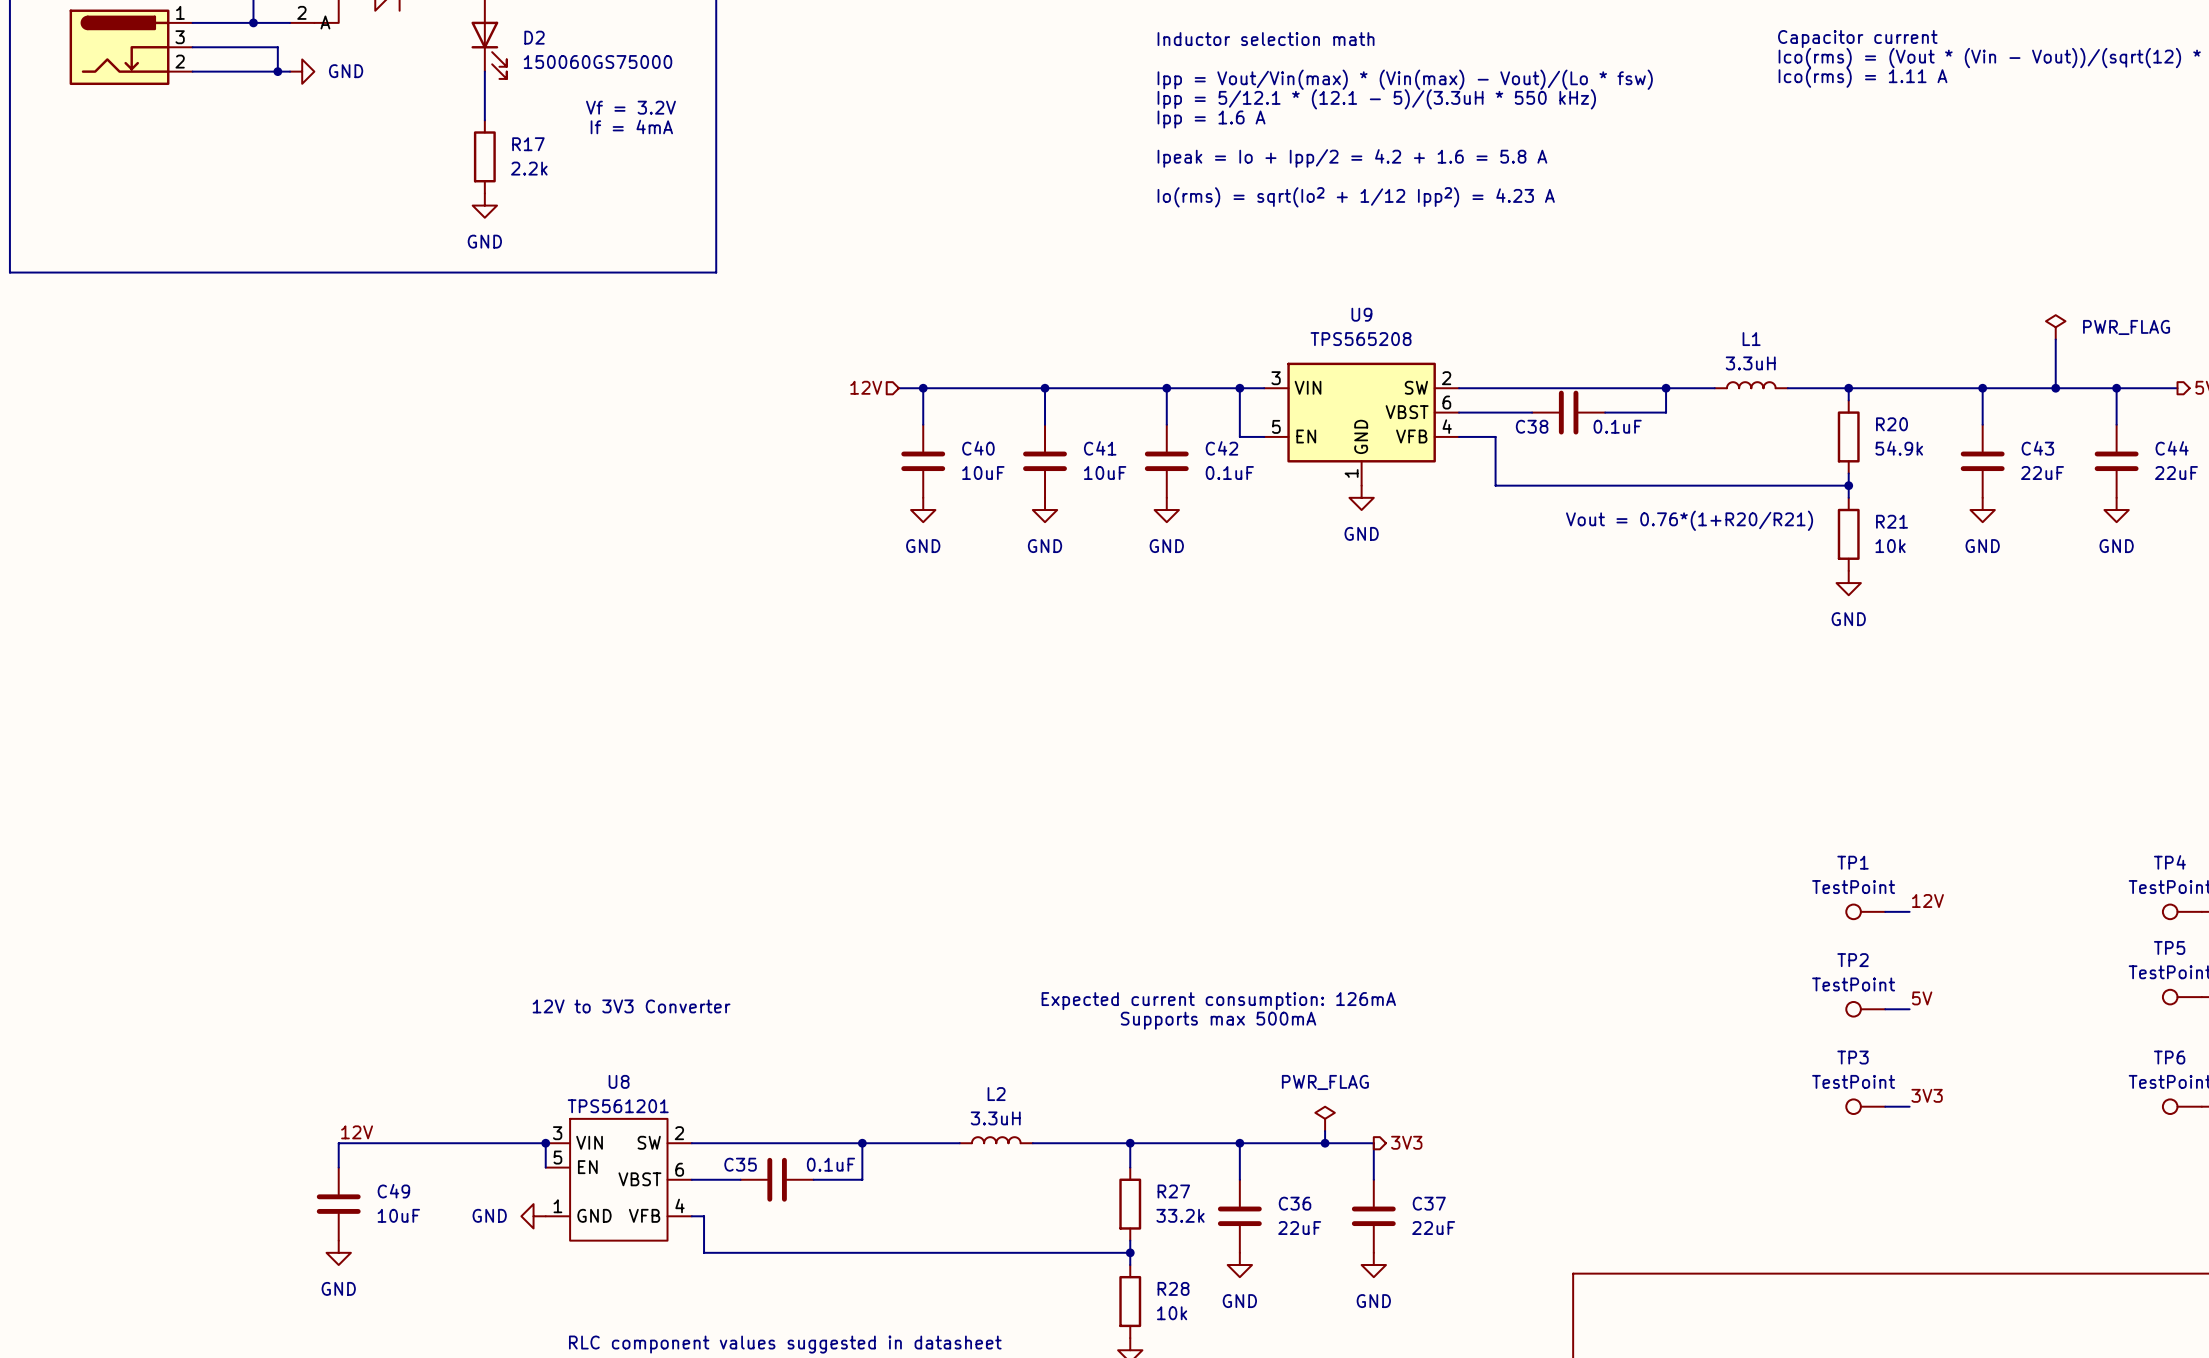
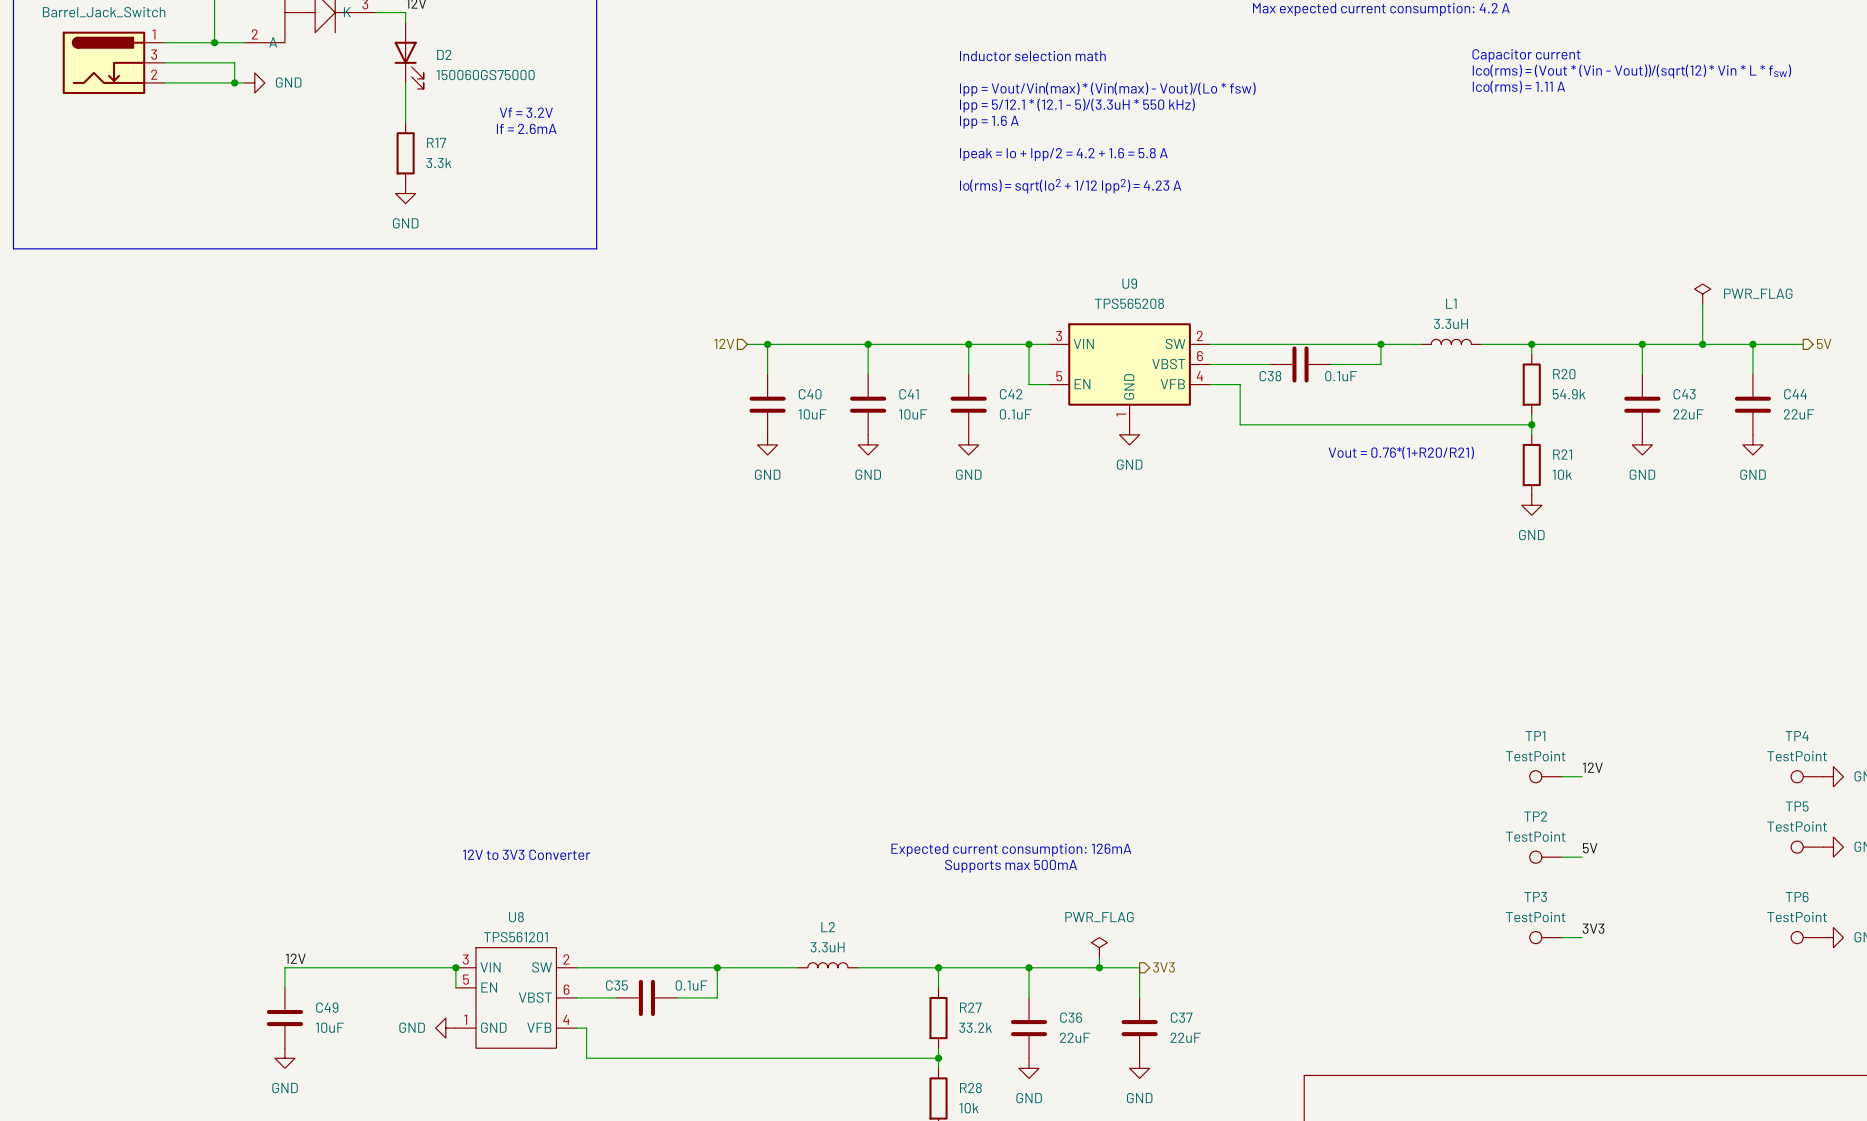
text: If = 4mA (631, 126) -> If = 2.6mA (526, 128)
R17 value: 2.2k (529, 168) -> 3.3k (438, 163)

